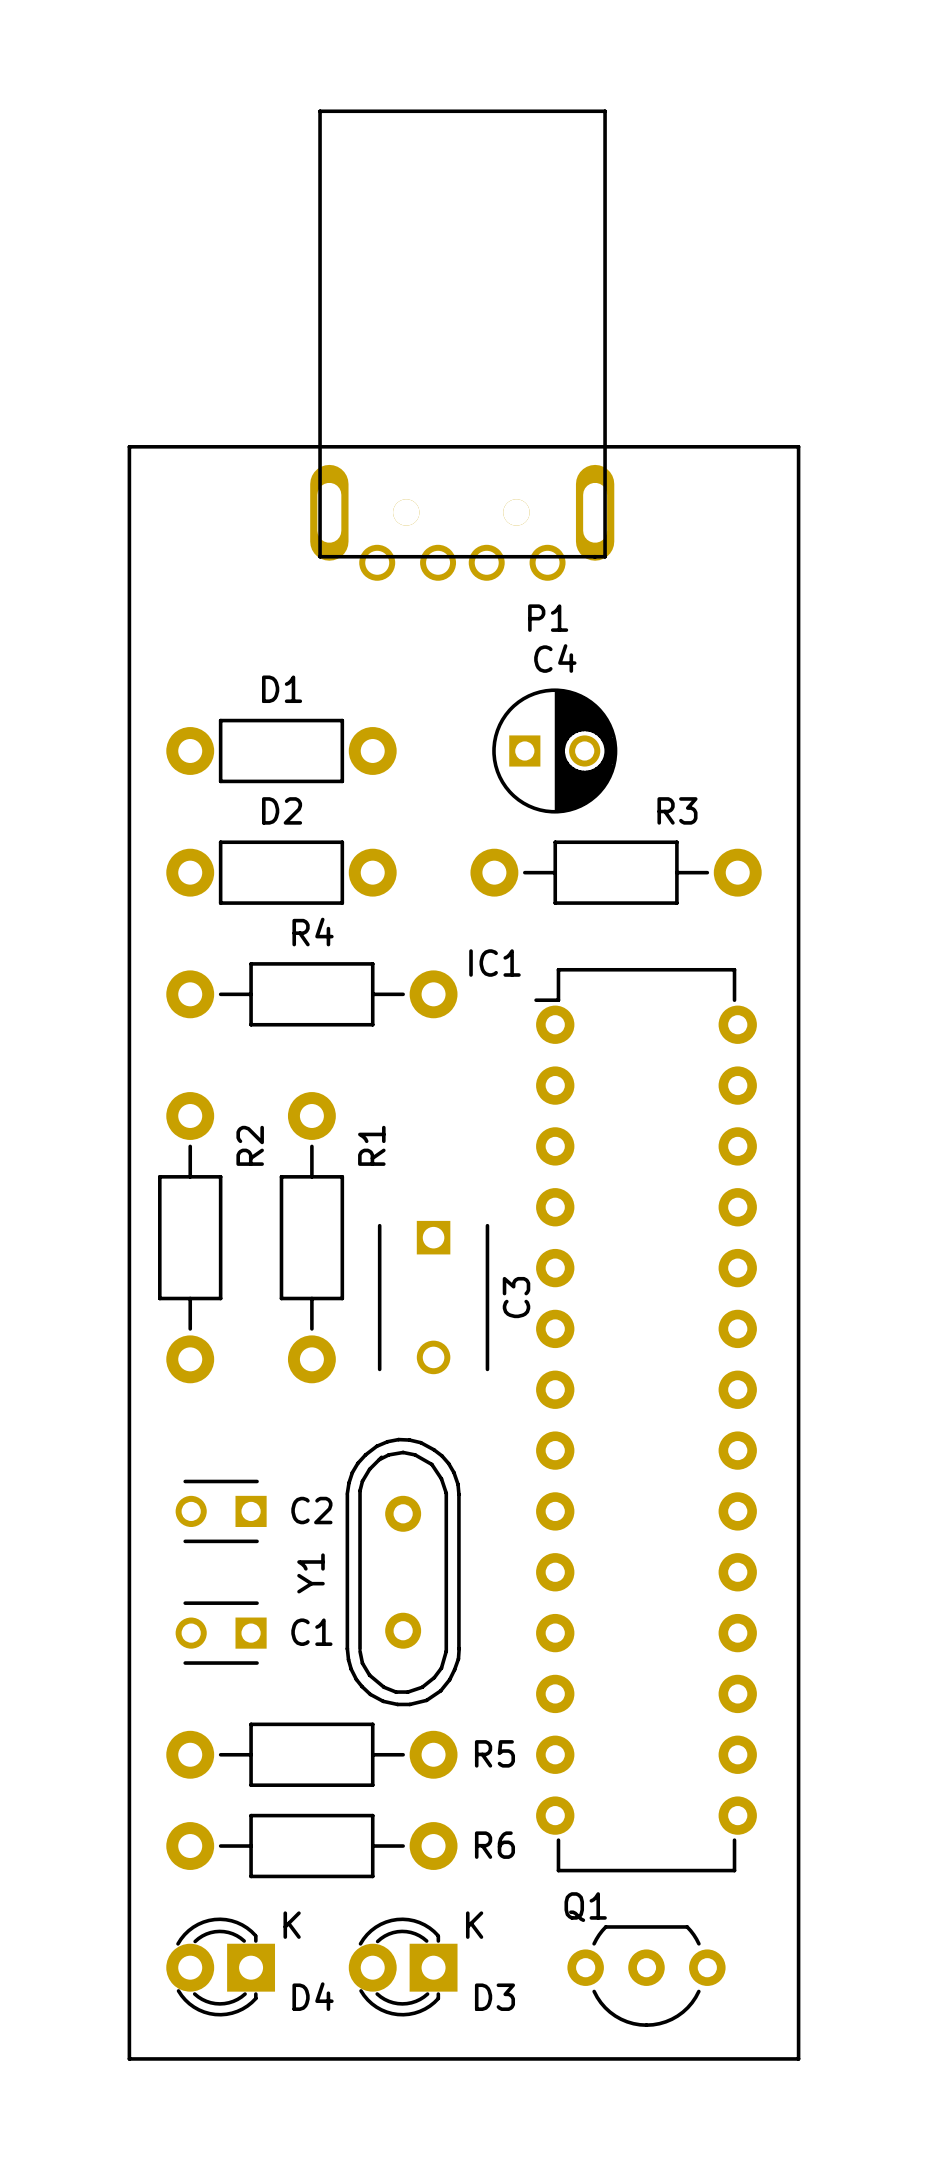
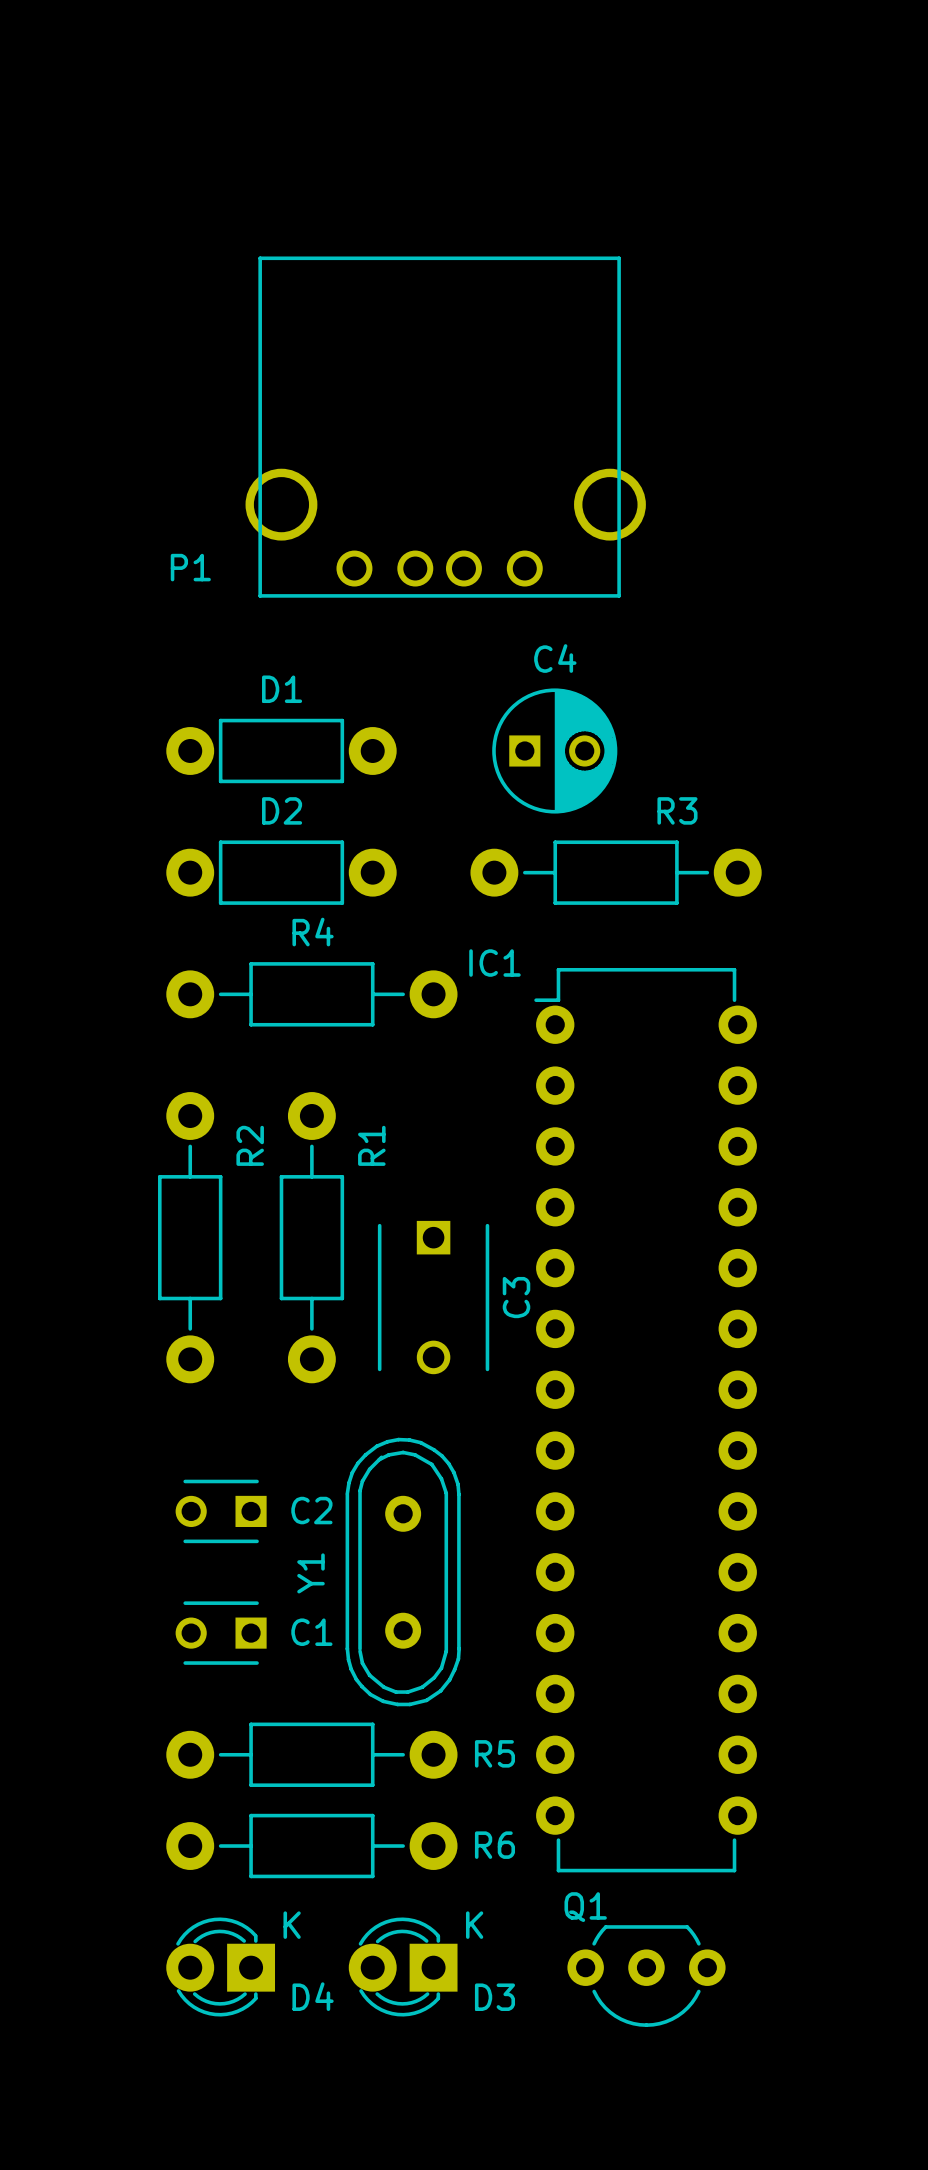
P1 footprint: [310, 109, 615, 581] -> [245, 256, 646, 598]
board edge: (129, 446) (798, 446) (798, 2058) (129, 2058) (129, 446) -> none
P1 name position: P1 (548, 618) -> P1 (190, 567)

